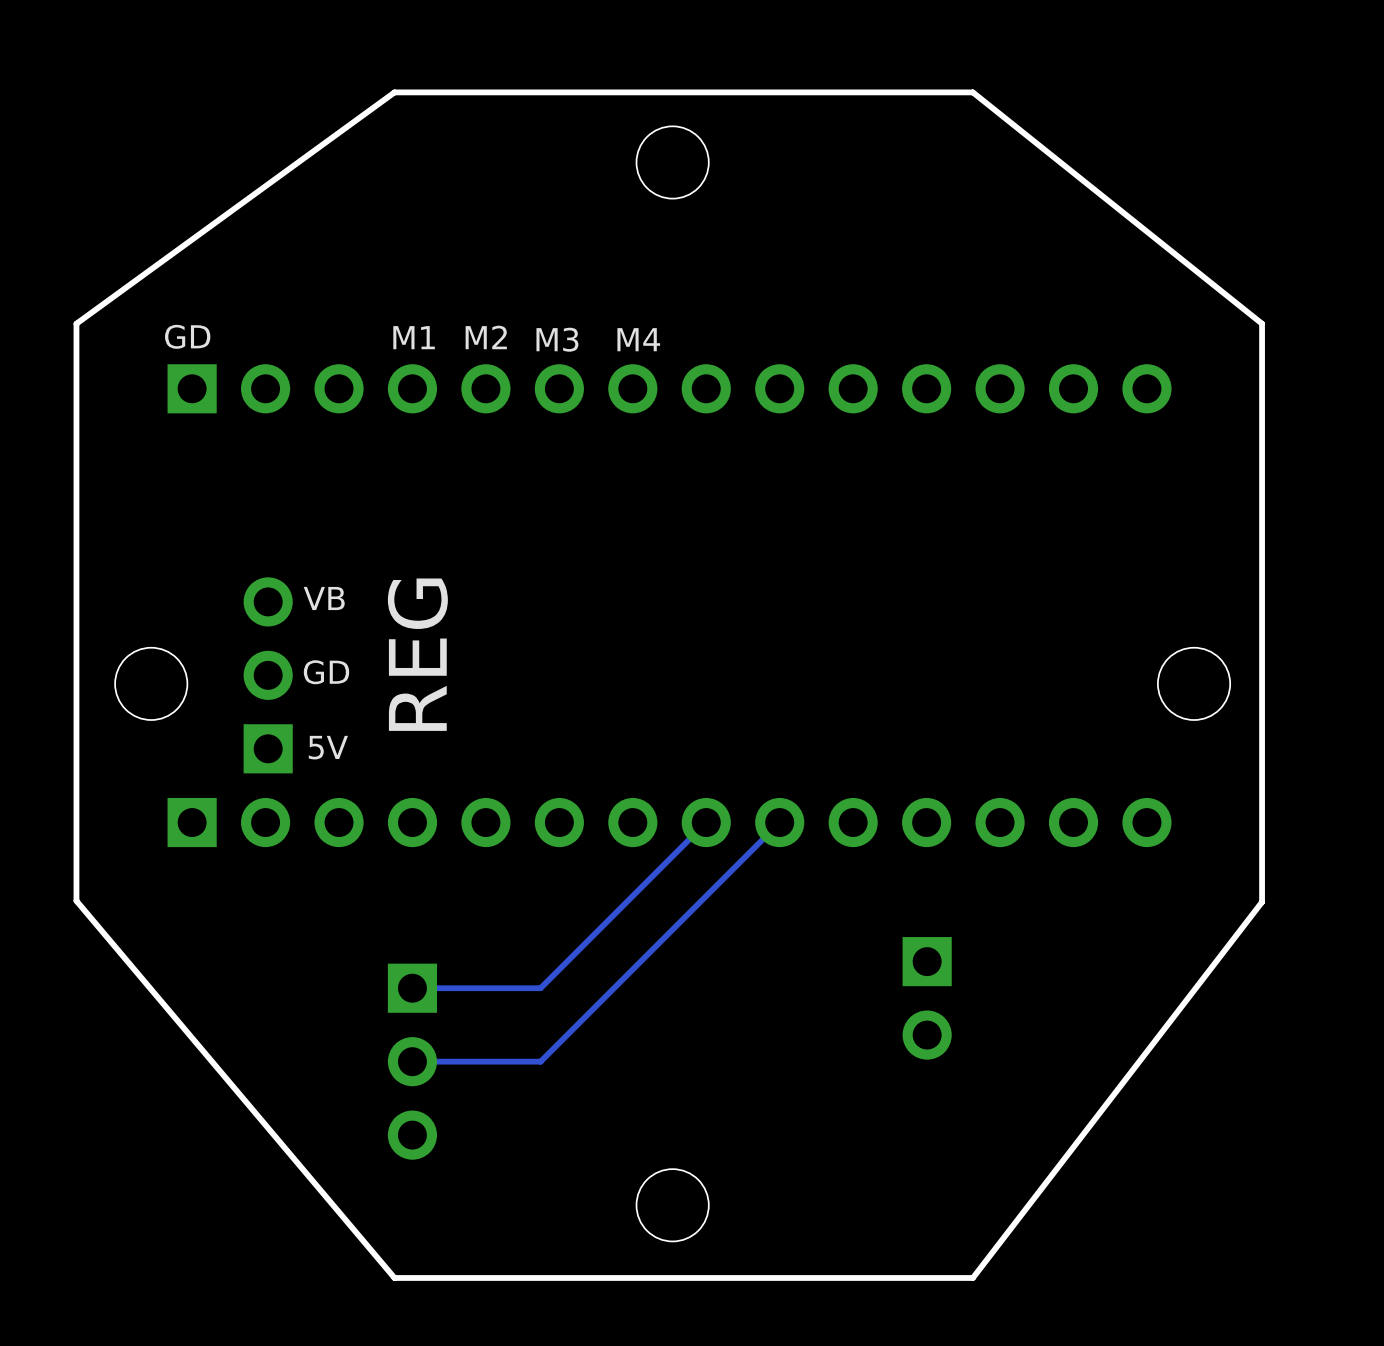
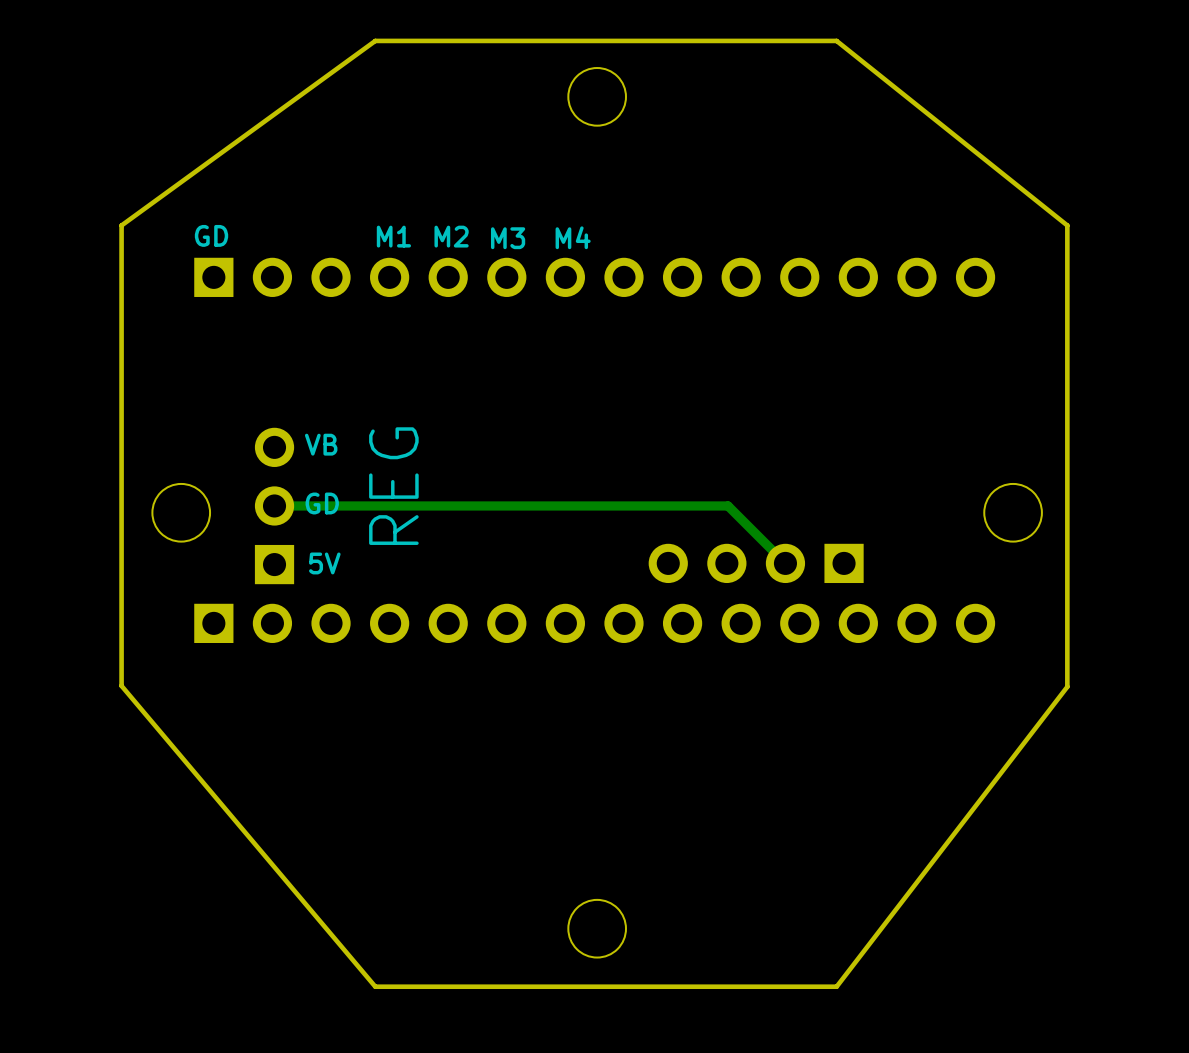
track: none -> (274, 505) (728, 505) (785, 563)
part: none -> (756, 563)
track: (706, 822) (540, 988) (412, 988) -> none
track: (779, 822) (540, 1061) (412, 1061) -> none
part: (927, 998) -> none
part: (412, 1061) -> none

